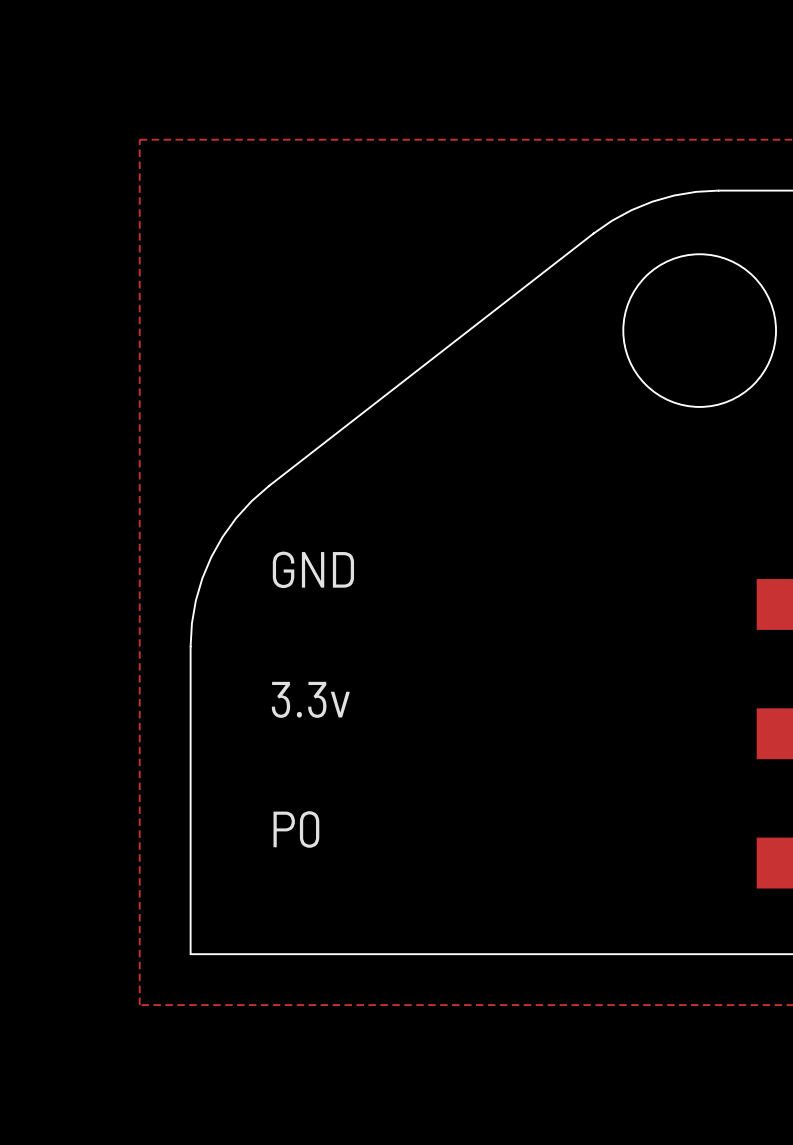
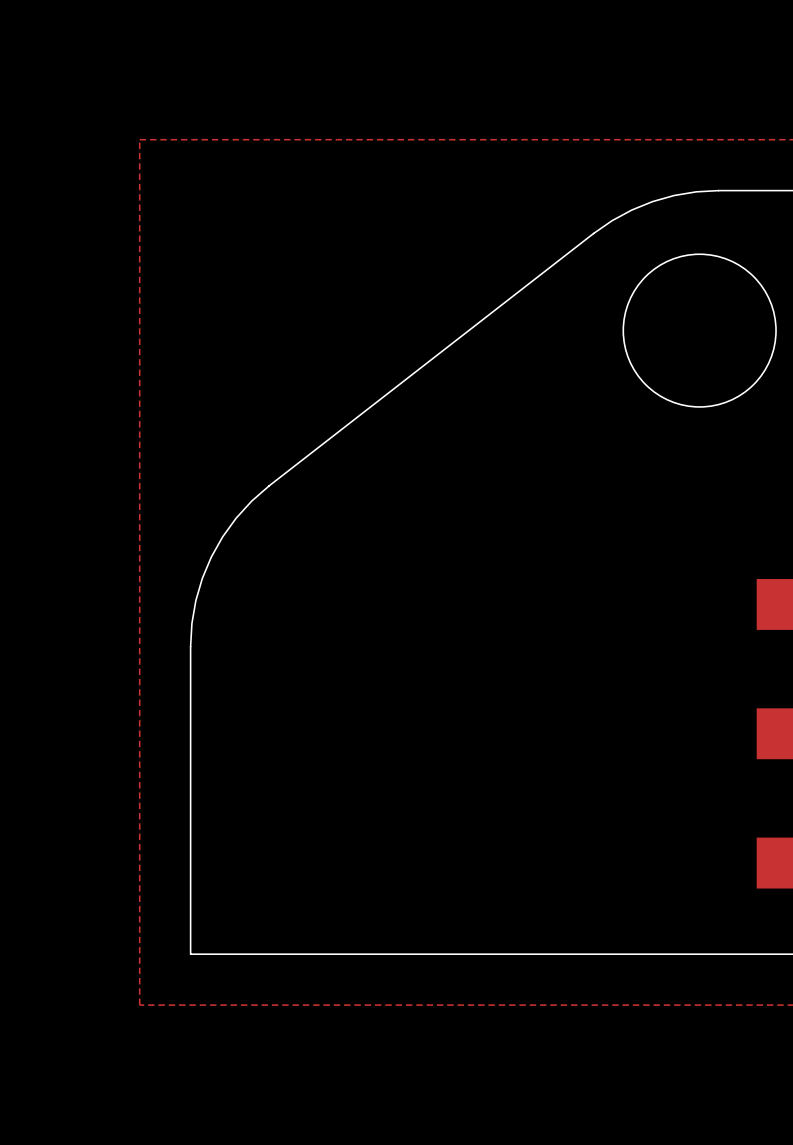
text: GND (313, 569) -> none
text: 3.3v (310, 699) -> none
text: P0 (296, 829) -> none

